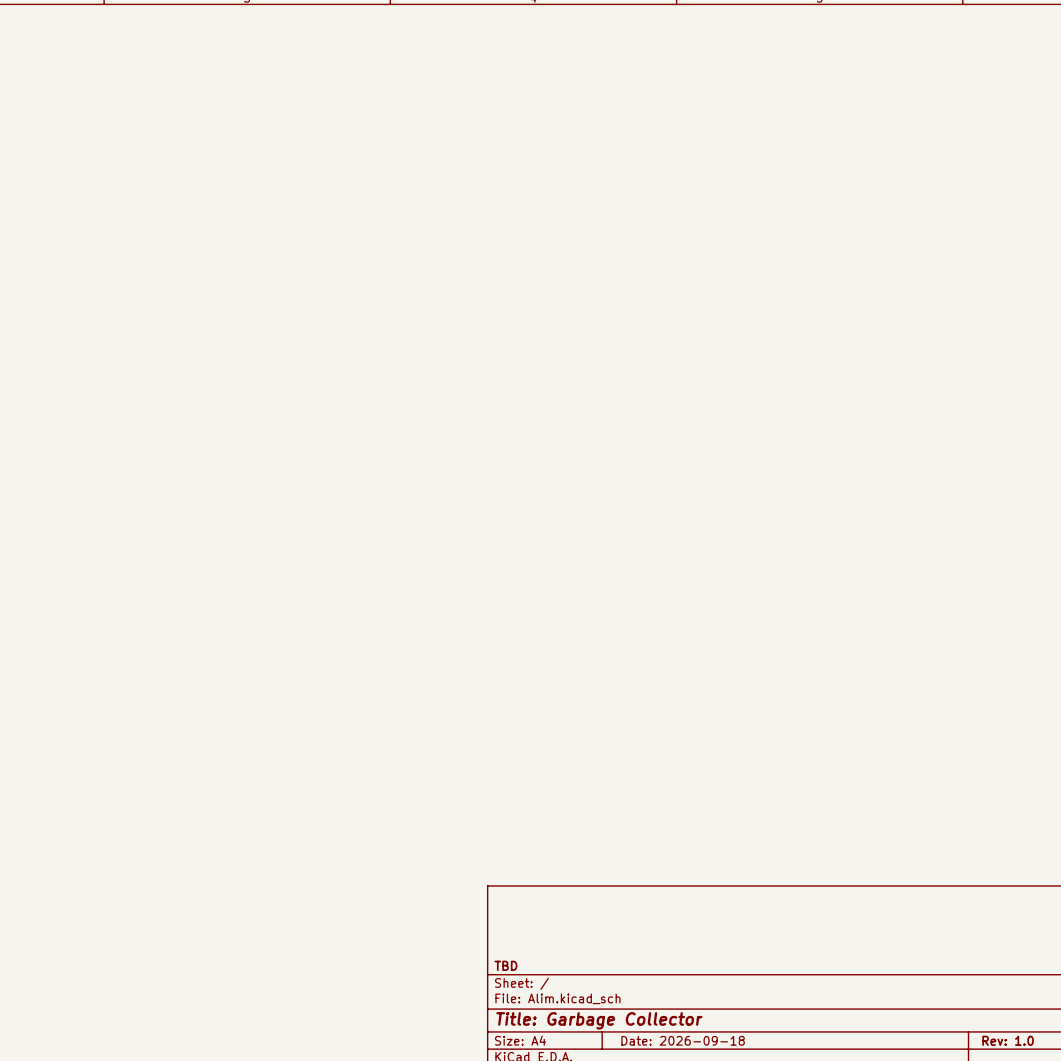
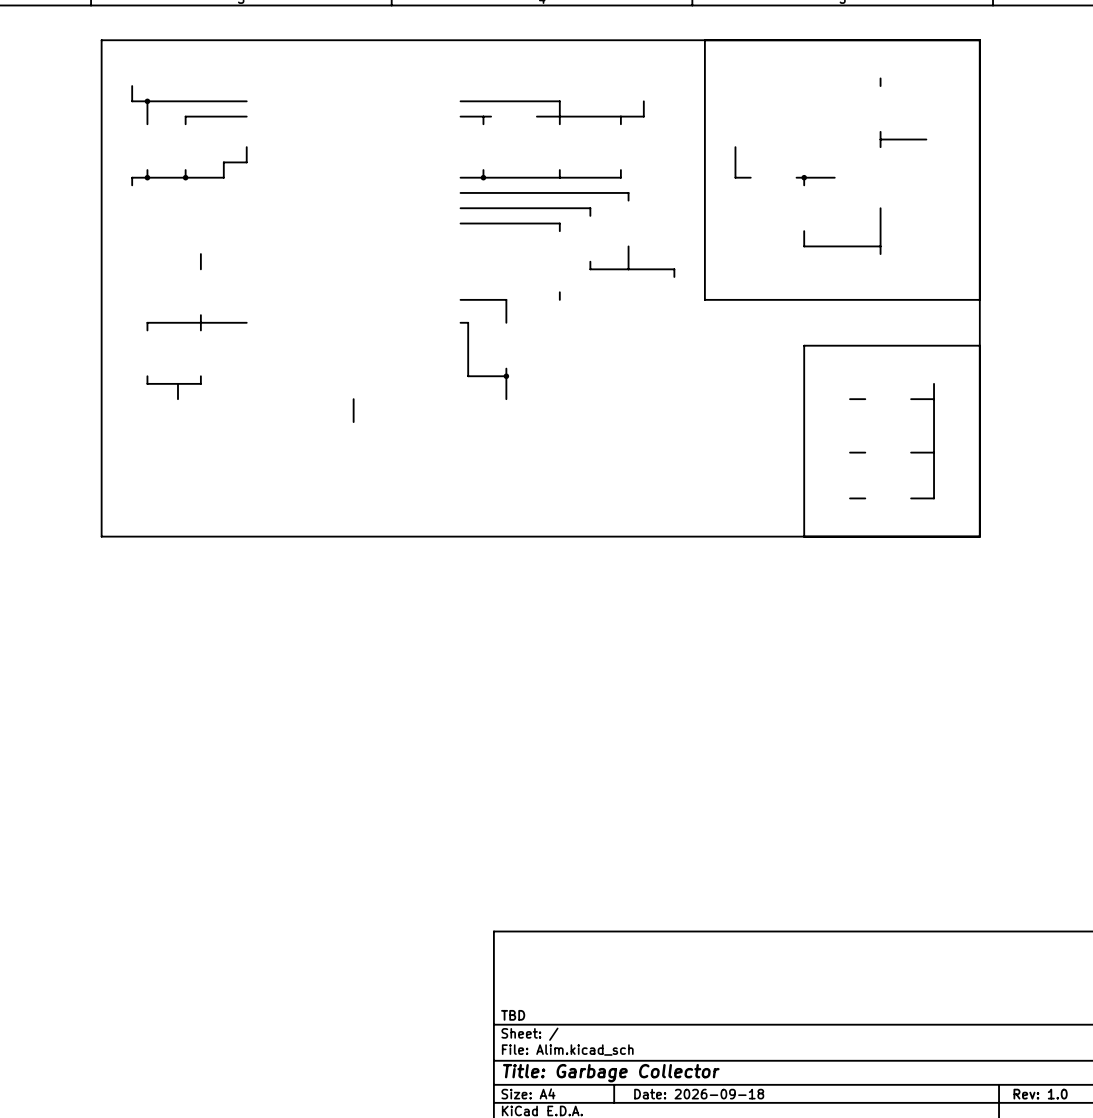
line: none -> (101, 40) (979, 40) (979, 536) (101, 536) (101, 40)
line: none -> (704, 40) (704, 299) (979, 299)
wire: none -> (880, 78) (880, 86)
wire: none -> (132, 86) (132, 101) (246, 101)
wire: none -> (147, 101) (147, 124)
junction: none -> (147, 101)
wire: none -> (460, 101) (559, 101) (559, 124)
wire: none -> (643, 101) (643, 116) (536, 116)
wire: none -> (246, 116) (185, 116) (185, 124)
wire: none -> (460, 116) (491, 116)
wire: none -> (483, 116) (483, 124)
wire: none -> (620, 116) (620, 124)
wire: none -> (880, 131) (880, 147)
wire: none -> (880, 139) (926, 139)
wire: none -> (246, 147) (246, 162) (223, 162) (223, 177) (132, 177) (132, 185)
wire: none -> (735, 147) (735, 177) (750, 177)
wire: none -> (147, 170) (147, 177)
wire: none -> (185, 170) (185, 177)
wire: none -> (483, 170) (483, 177)
wire: none -> (559, 170) (559, 177)
wire: none -> (620, 170) (620, 177) (460, 177)
junction: none -> (147, 177)
junction: none -> (185, 177)
junction: none -> (483, 177)
wire: none -> (796, 177) (834, 177)
wire: none -> (804, 177) (804, 185)
junction: none -> (804, 177)
wire: none -> (460, 192) (628, 192) (628, 200)
wire: none -> (460, 208) (590, 208) (590, 215)
wire: none -> (880, 208) (880, 254)
wire: none -> (460, 223) (559, 223) (559, 231)
wire: none -> (804, 231) (804, 246) (880, 246)
wire: none -> (628, 246) (628, 269)
wire: none -> (200, 254) (200, 269)
wire: none -> (590, 261) (590, 269) (674, 269) (674, 276)
wire: none -> (559, 292) (559, 299)
wire: none -> (460, 299) (506, 299) (506, 322)
wire: none -> (200, 315) (200, 330)
wire: none -> (246, 322) (147, 322) (147, 330)
wire: none -> (460, 322) (468, 322) (468, 376) (506, 376)
line: none -> (979, 345) (804, 345) (804, 536)
wire: none -> (506, 368) (506, 399)
wire: none -> (147, 376) (147, 383) (200, 383) (200, 376)
junction: none -> (506, 376)
wire: none -> (177, 383) (177, 399)
wire: none -> (934, 383) (934, 498) (911, 498)
wire: none -> (353, 399) (353, 422)
wire: none -> (850, 399) (865, 399)
wire: none -> (911, 399) (934, 399)
wire: none -> (850, 452) (865, 452)
wire: none -> (911, 452) (934, 452)
wire: none -> (850, 498) (865, 498)

